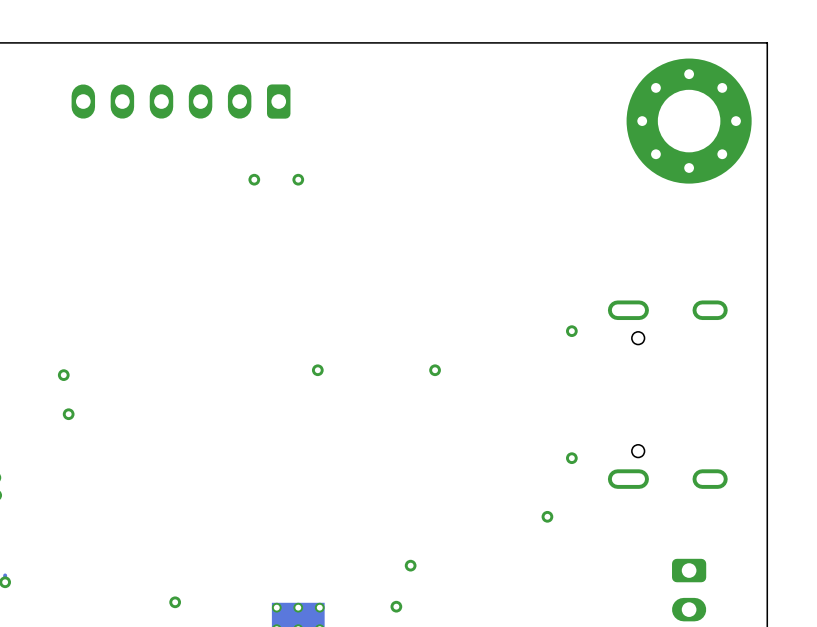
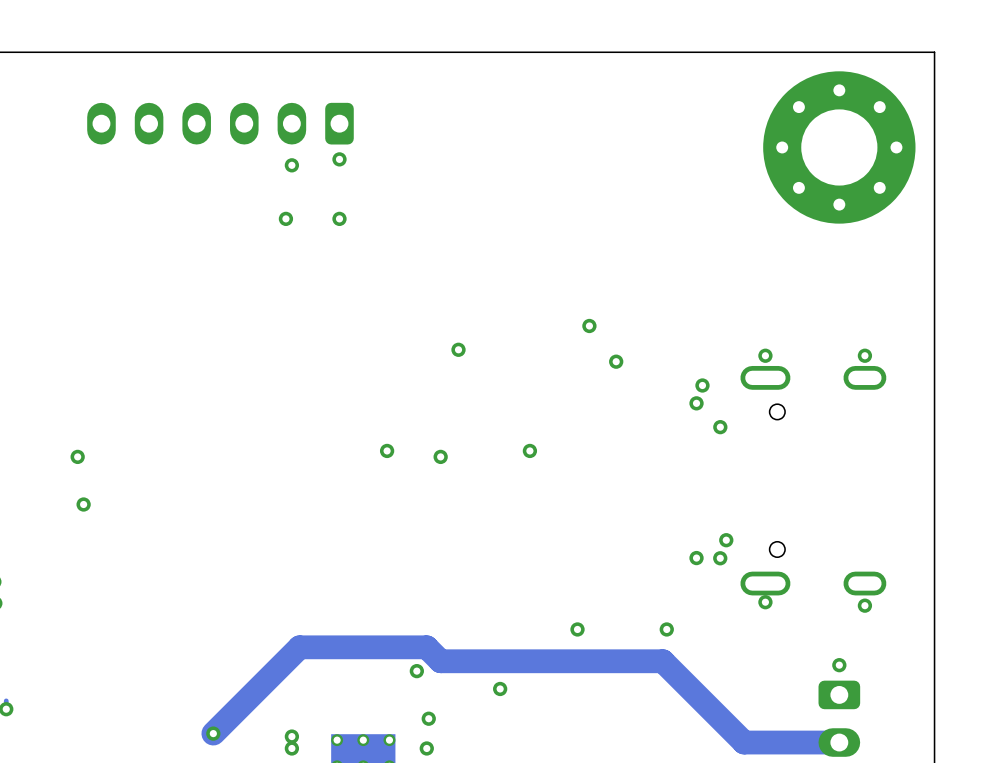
via: none -> (339, 159)
via: none -> (291, 165)
via: none -> (285, 218)
via: (254, 179) -> none
via: none -> (339, 218)
via: (298, 179) -> none
via: none -> (589, 325)
via: none -> (458, 349)
via: none -> (765, 355)
via: none -> (864, 355)
via: none -> (616, 361)
via: none -> (702, 385)
via: none -> (720, 427)
via: none -> (440, 456)
via: none -> (726, 540)
via: none -> (720, 558)
via: none -> (765, 602)
via: none -> (864, 605)
via: none -> (577, 629)
via: none -> (839, 665)
via: none -> (416, 671)
via: none -> (428, 718)
track: none -> (213, 733) (299, 647) (426, 647) (440, 661) (662, 661) (744, 742) (839, 742)
via: none -> (291, 736)
via: (396, 606) -> none
via: none -> (291, 748)
via: none -> (426, 748)

